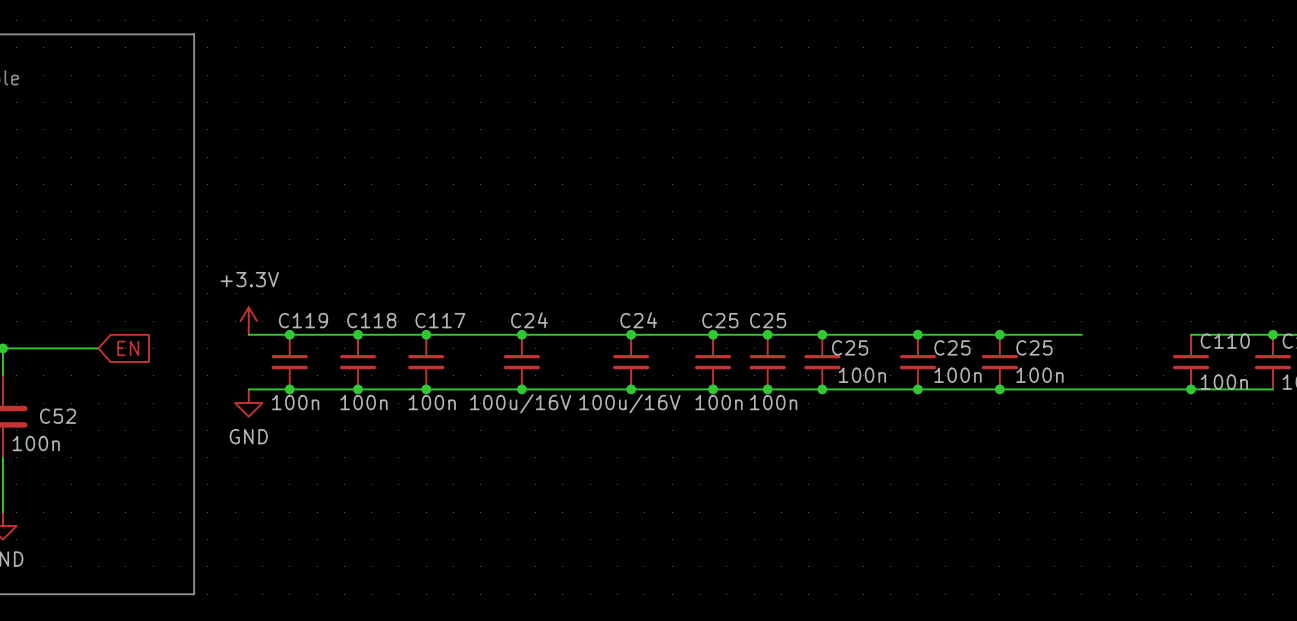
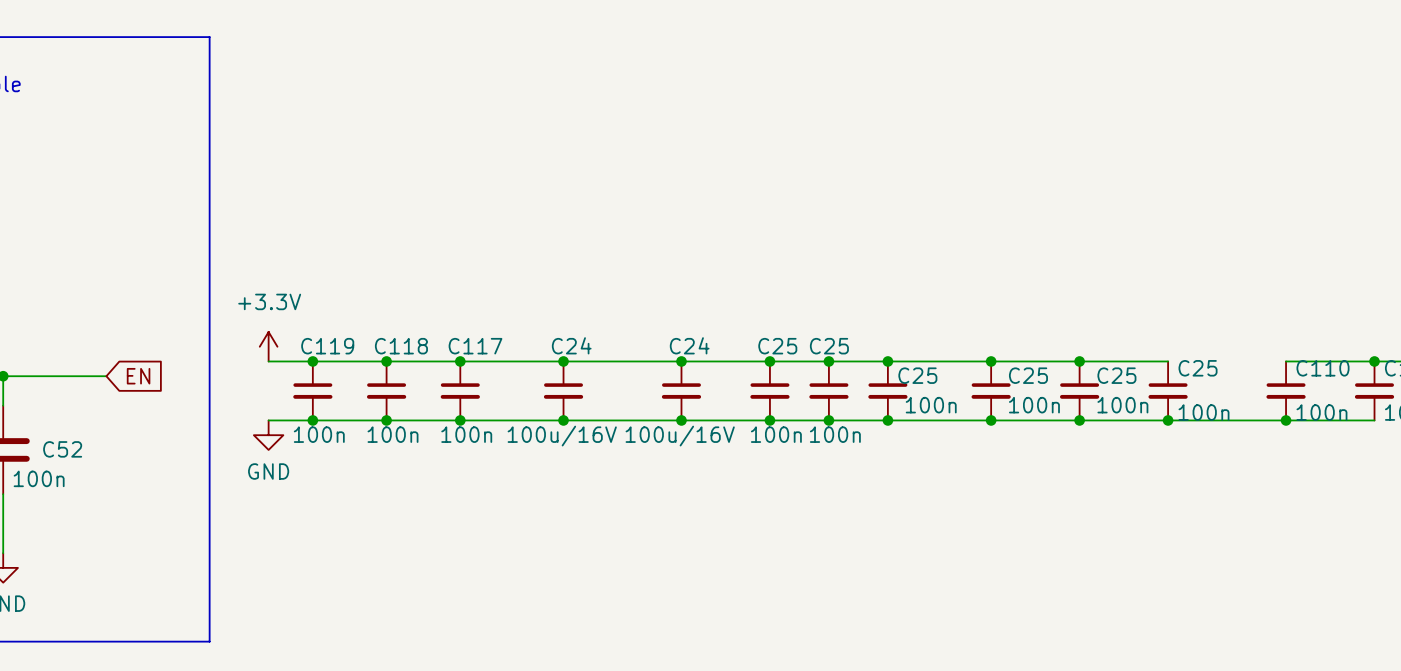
C25: none -> 100n (1168, 390)
junction: none -> (1168, 420)

